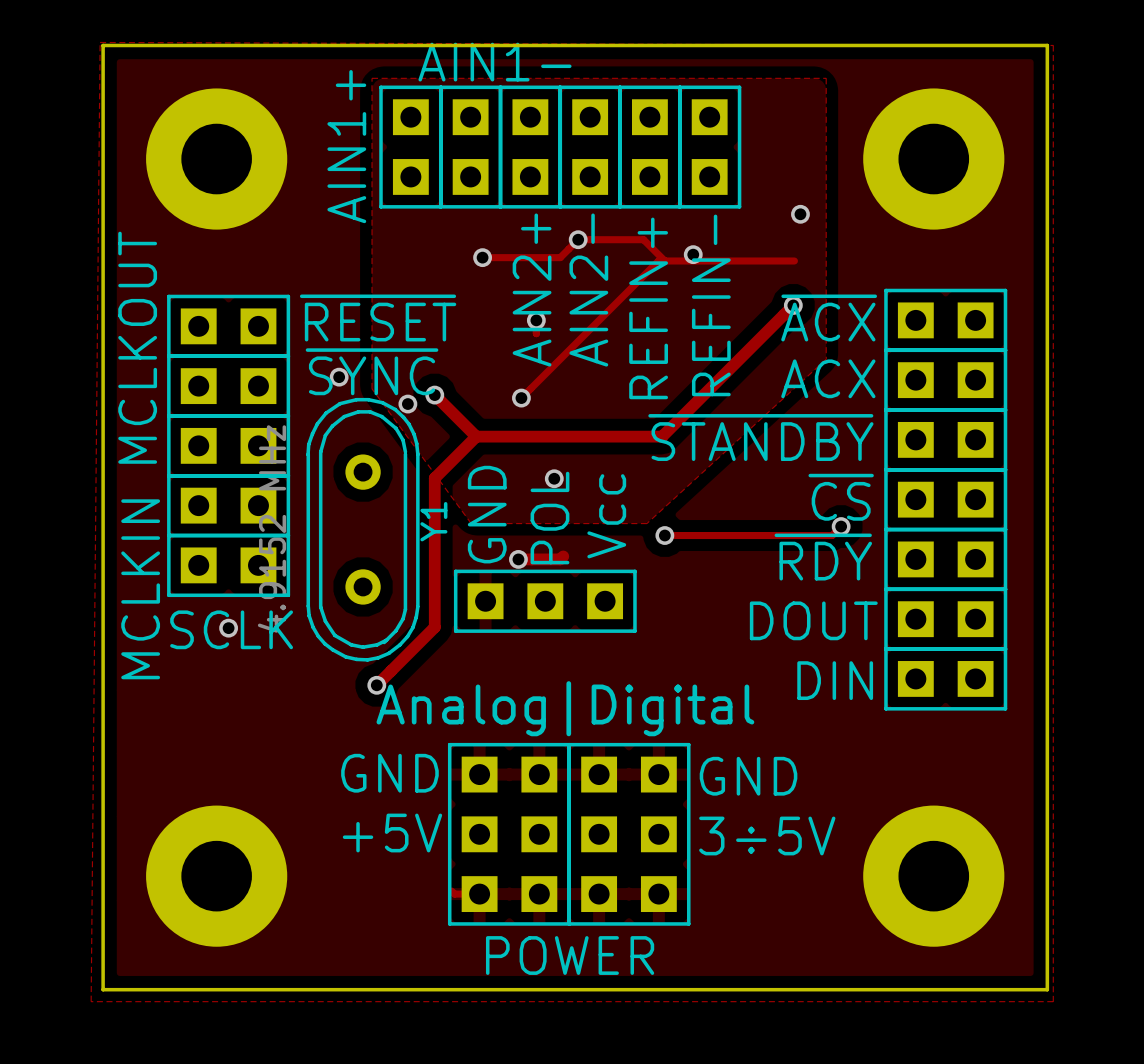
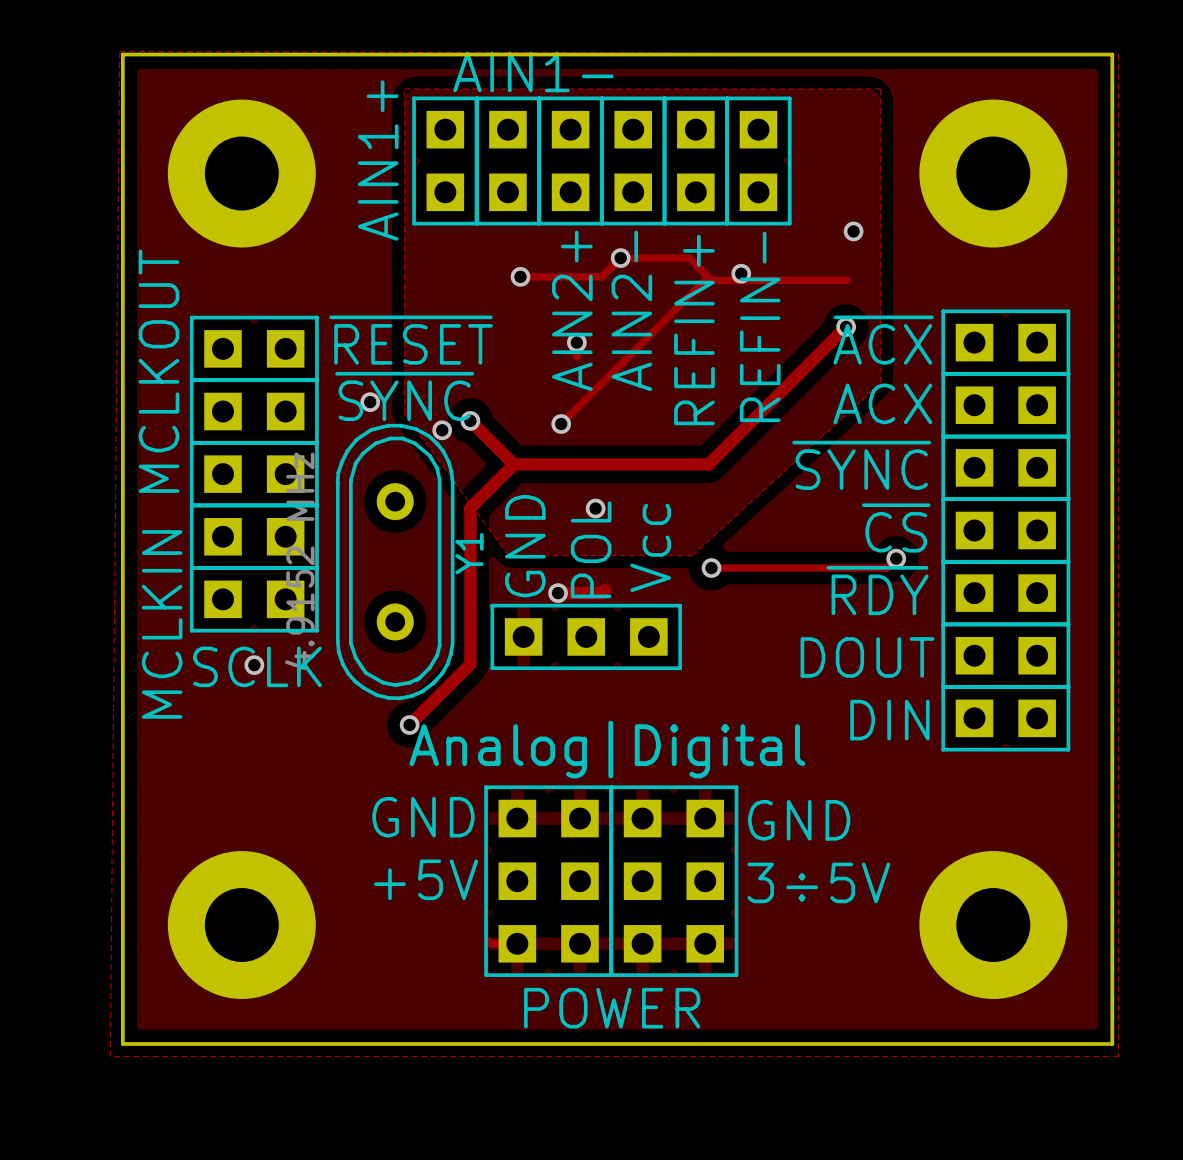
part value: ~{STANDBY} (760, 437) -> ~{SYNC} (861, 465)

